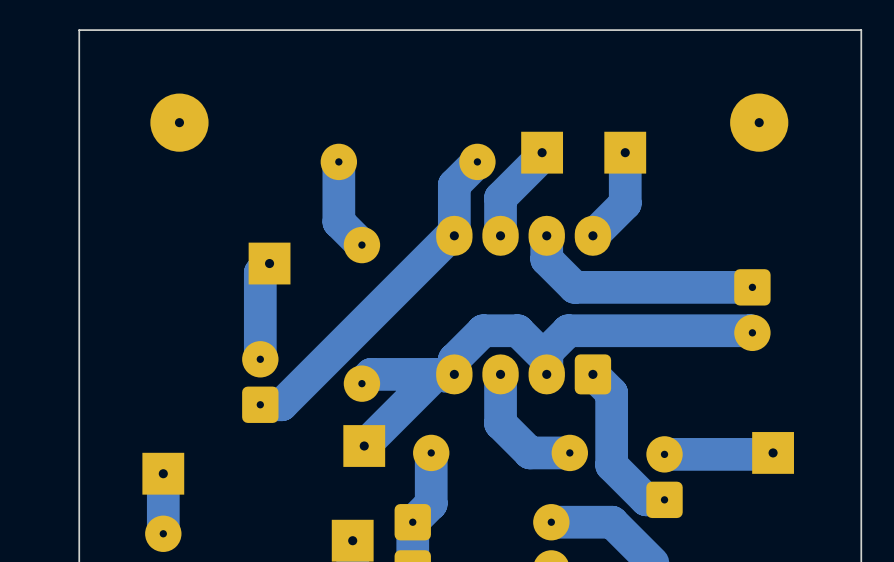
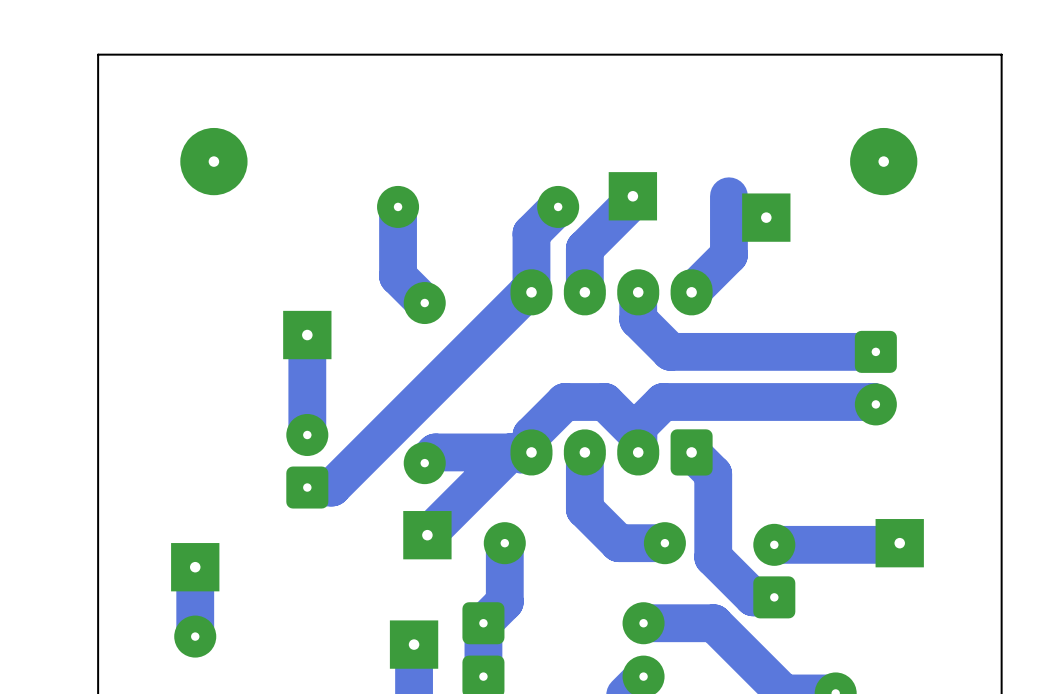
part position: (625, 152) -> (766, 217)
part position: (269, 263) -> (307, 335)

